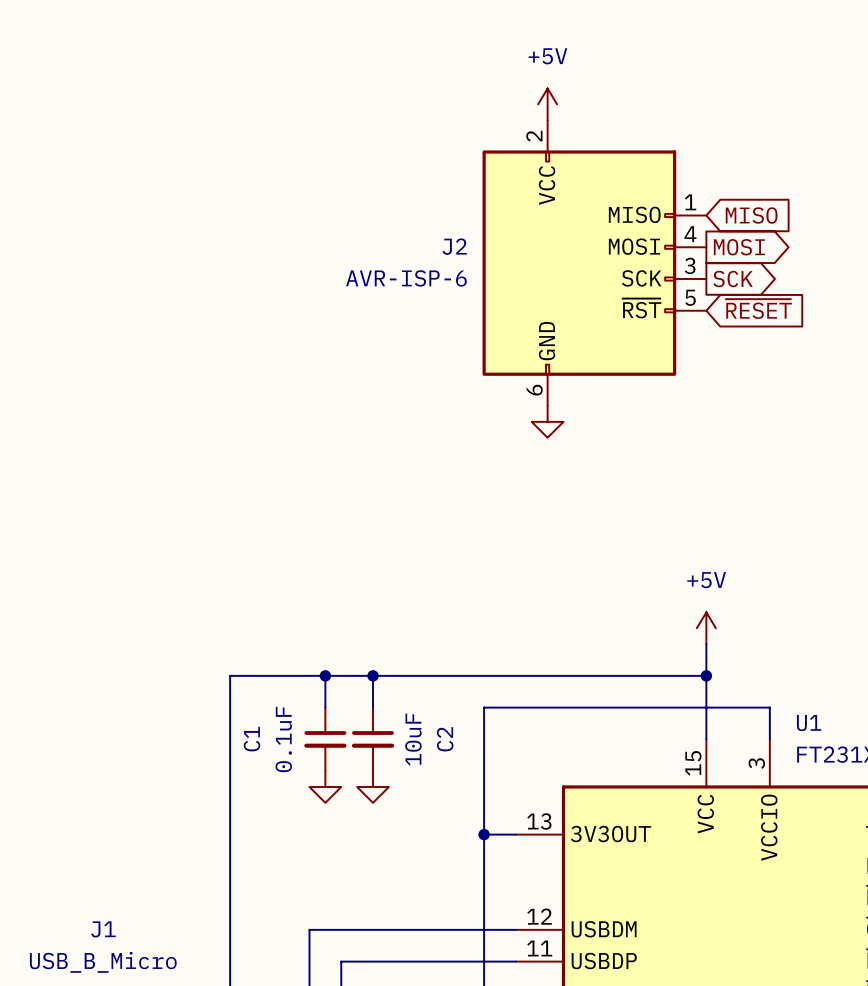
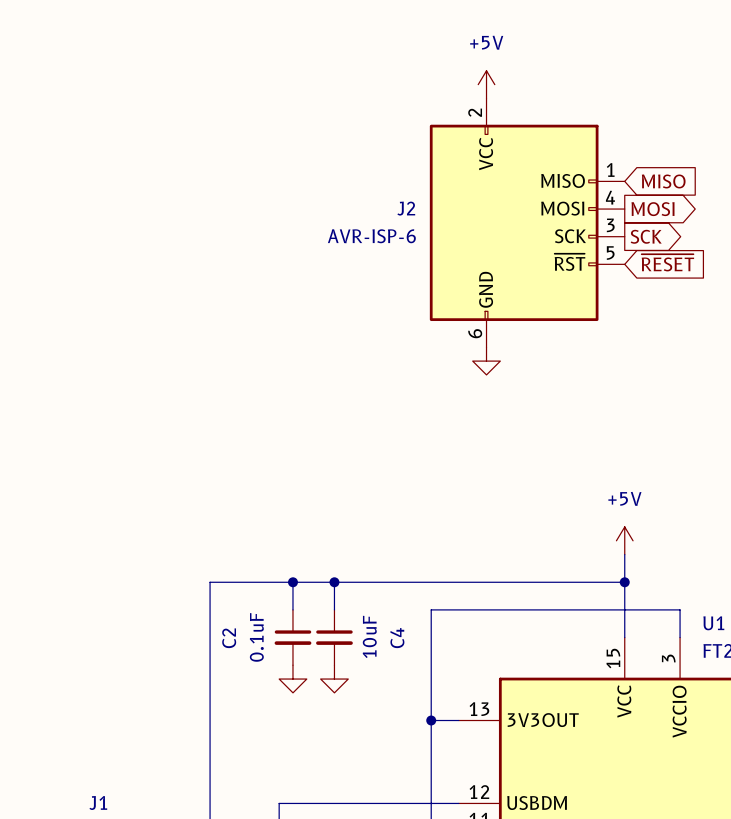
C1 name: C1 (252, 739) -> C2 (229, 638)
C2 name: C2 (445, 739) -> C4 (397, 638)

